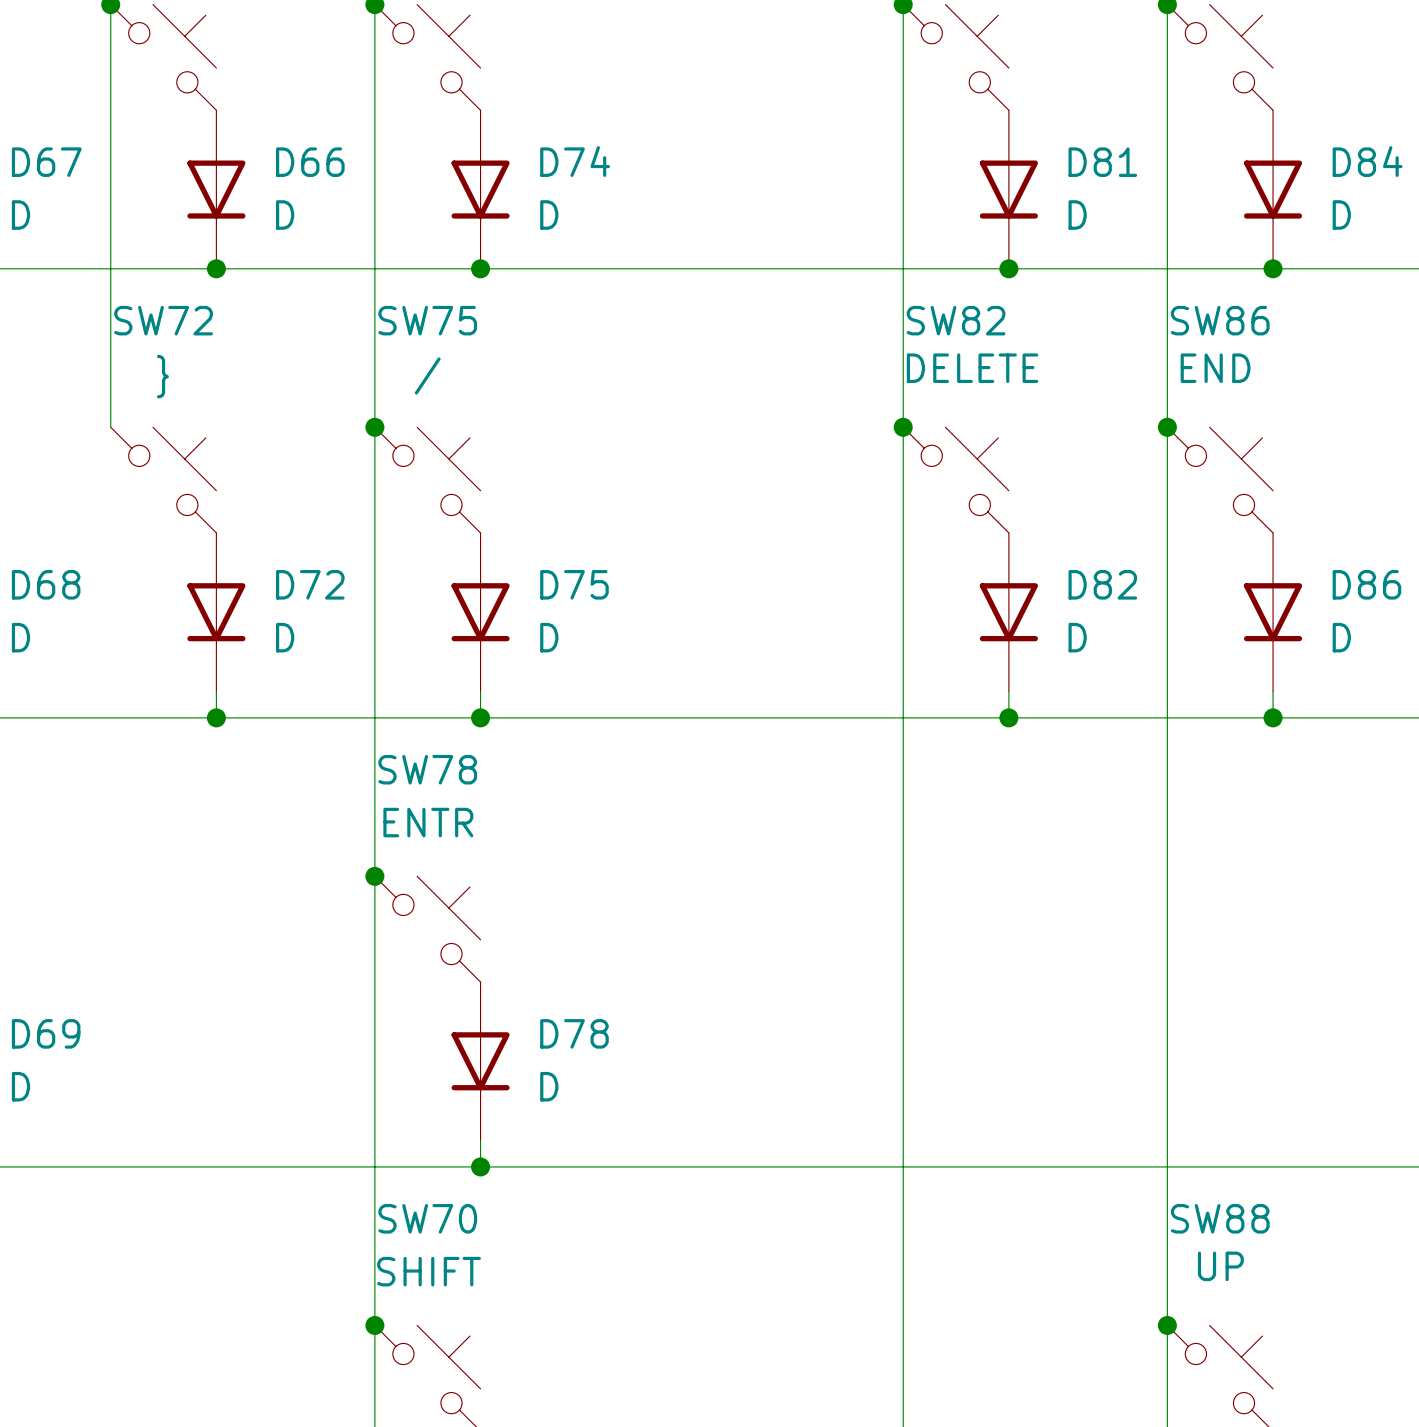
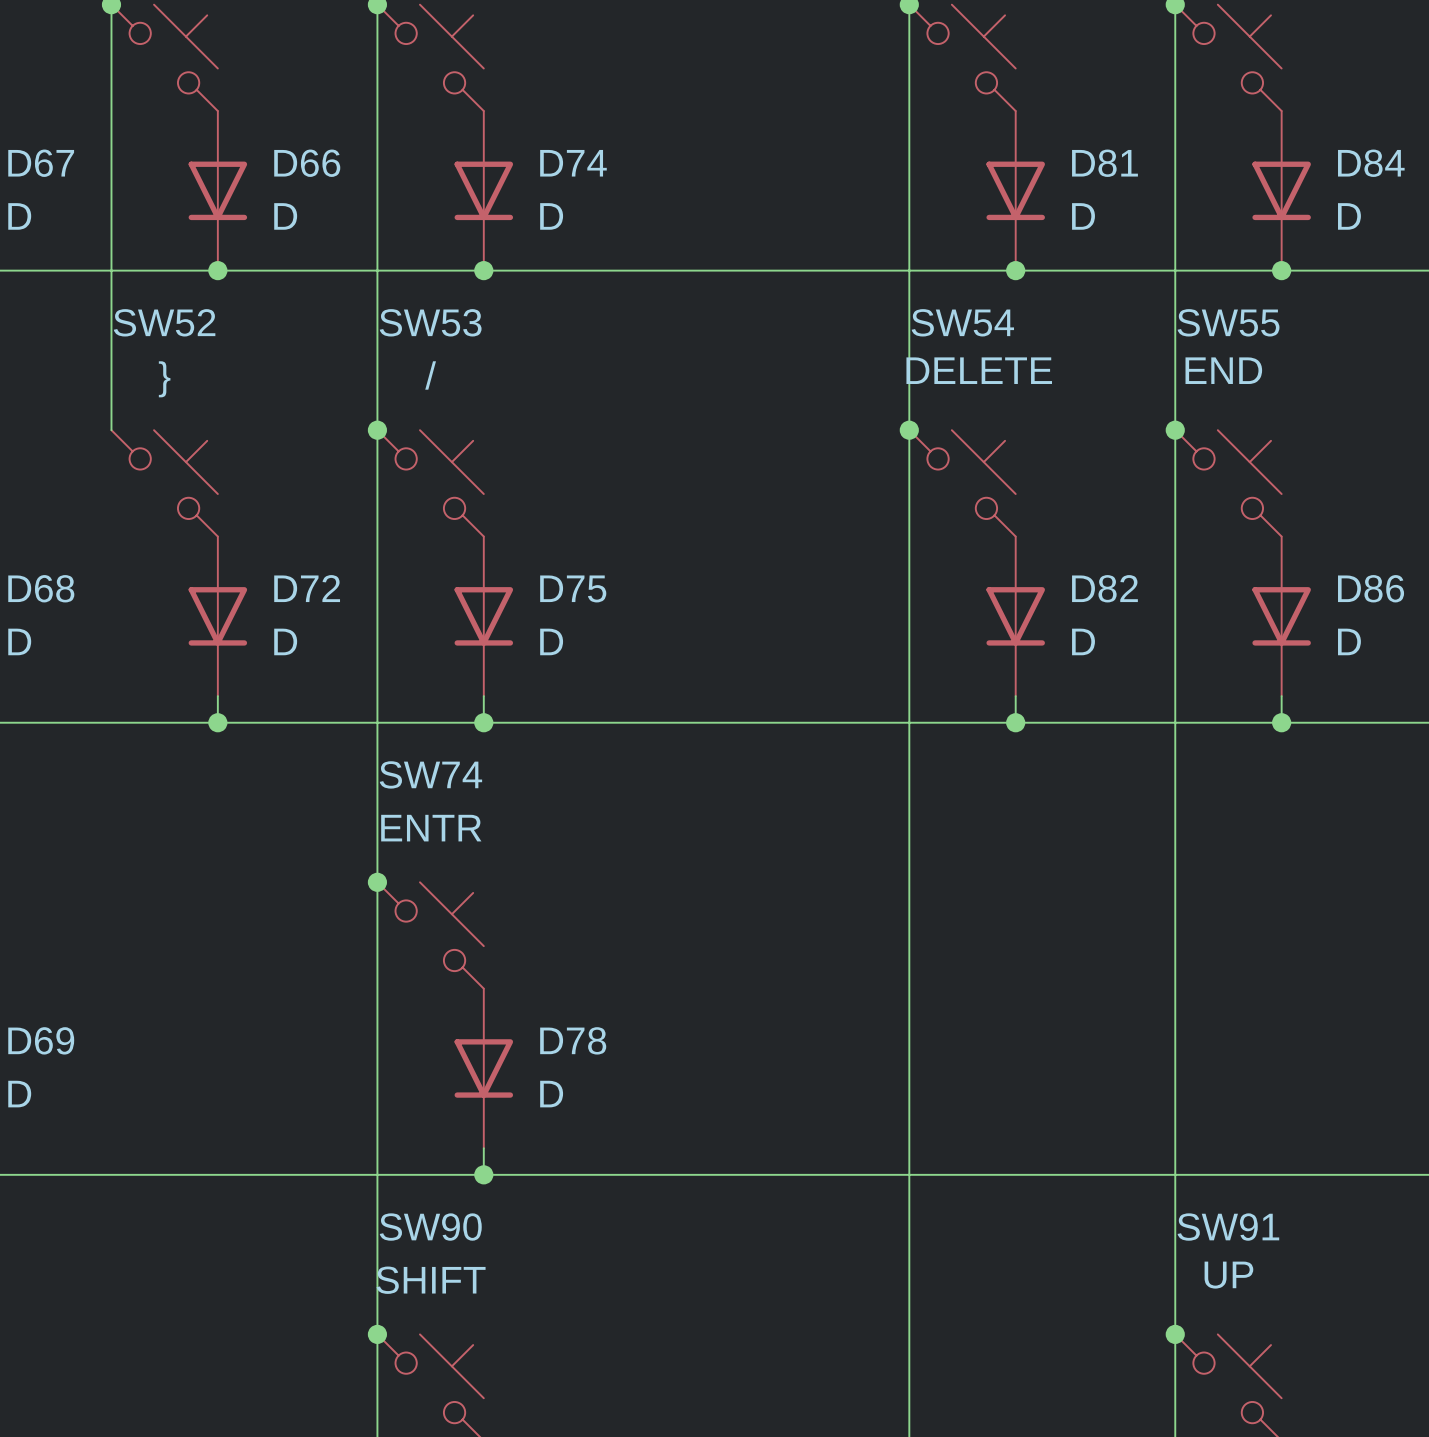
SW72 name: SW72 (163, 320) -> SW52 (164, 322)
SW75 name: SW75 (427, 320) -> SW53 (430, 322)
SW82 name: SW82 (956, 320) -> SW54 (962, 322)
SW86 name: SW86 (1220, 320) -> SW55 (1228, 322)
SW78 name: SW78 (427, 769) -> SW74 (430, 774)
SW70 name: SW70 (427, 1218) -> SW90 (430, 1227)
SW88 name: SW88 (1220, 1218) -> SW91 (1228, 1227)

